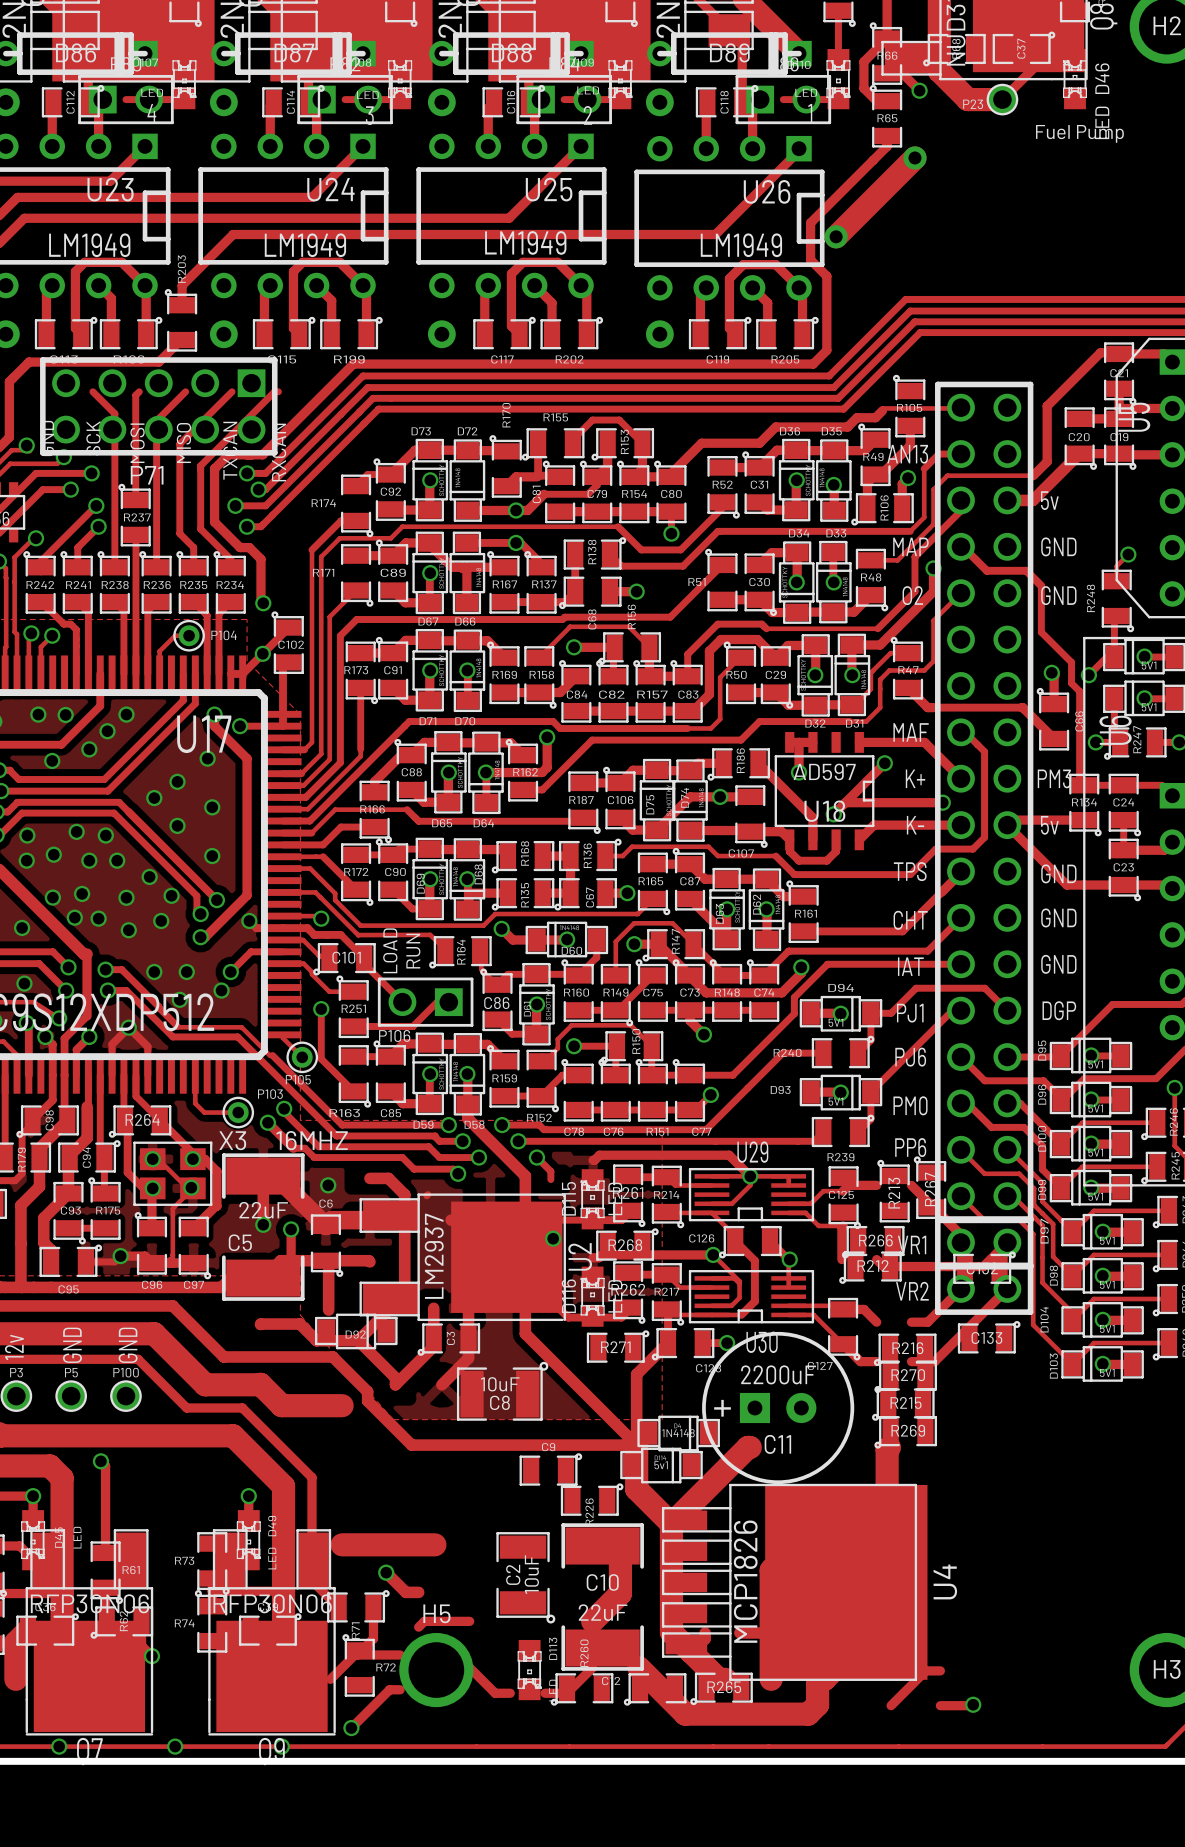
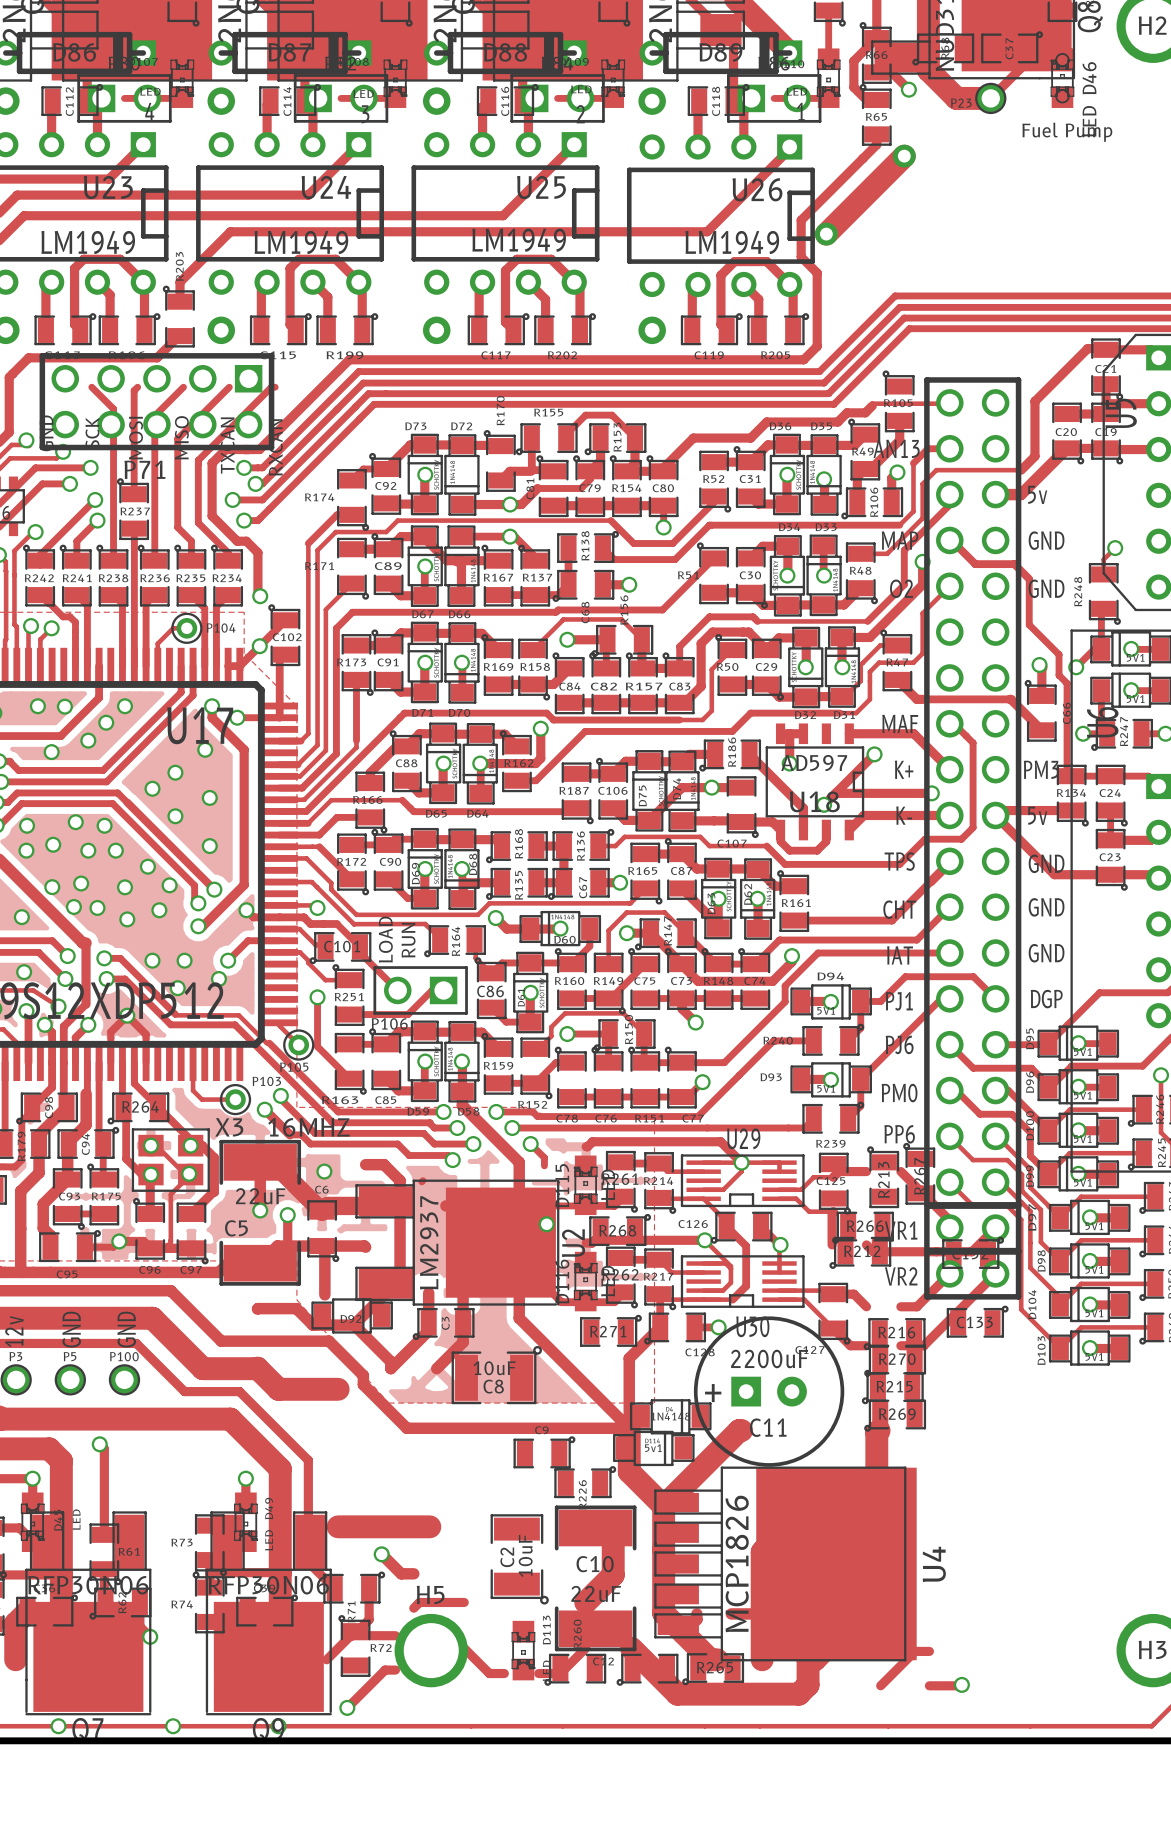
D46 footprint: [1062, 49, 1088, 110] -> [1050, 48, 1075, 108]

